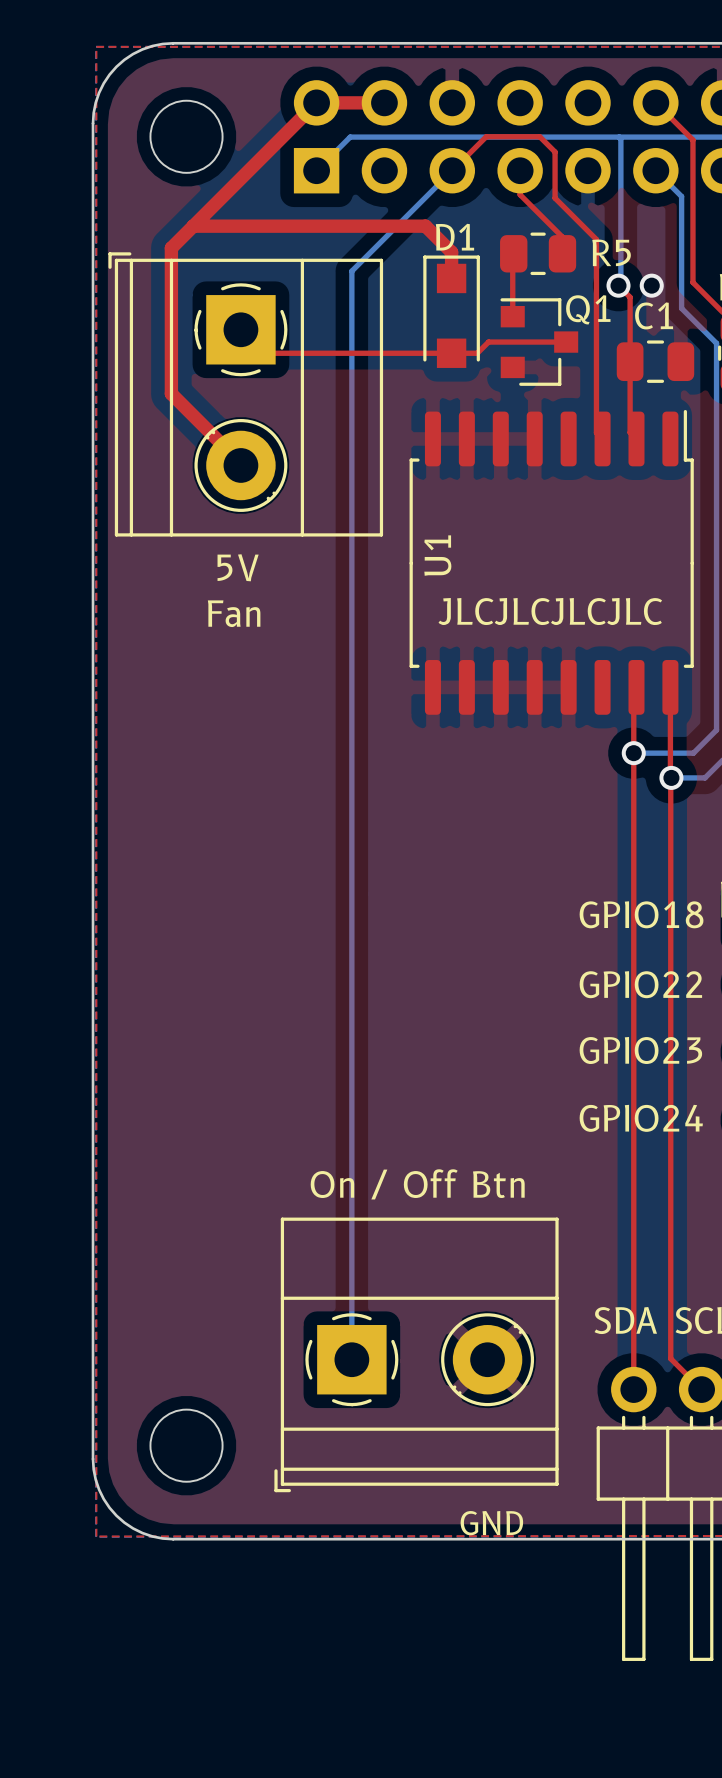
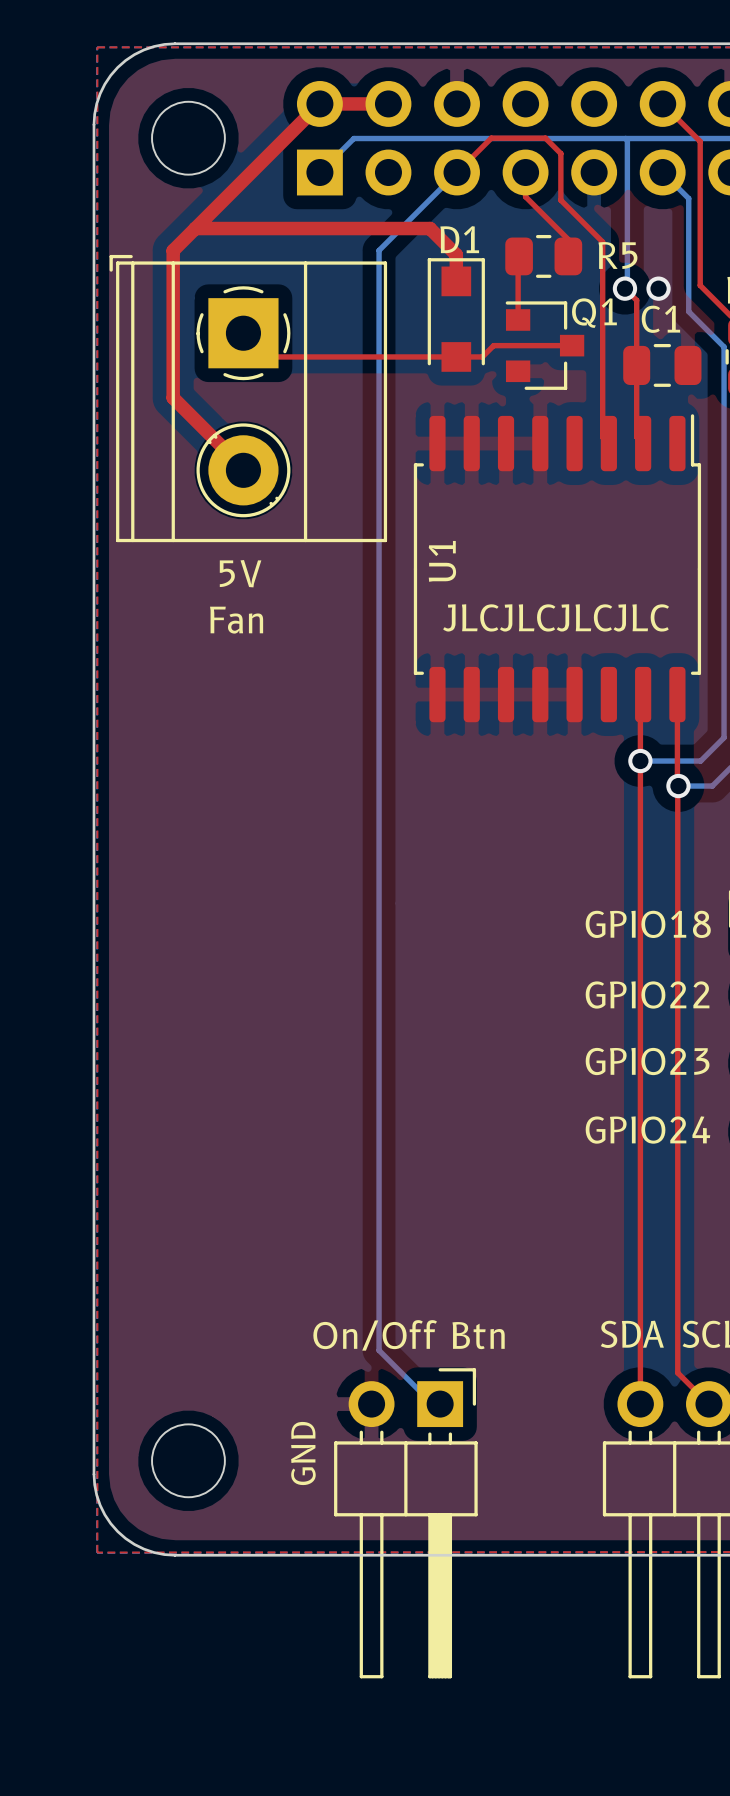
bottom track: (375, 247) (351, 271) (351, 1359) -> (379, 250) (379, 1350) (440, 1411)
text: On / Off Btn (417, 1184) -> none
text: none -> On/Off Btn (409, 1335)
part: (416, 1354) -> none
part: none -> (405, 1523)
text rotation: 0° (491, 1523) -> 90° counterclockwise (303, 1453)
text position: GND (491, 1523) -> GND (303, 1453)

